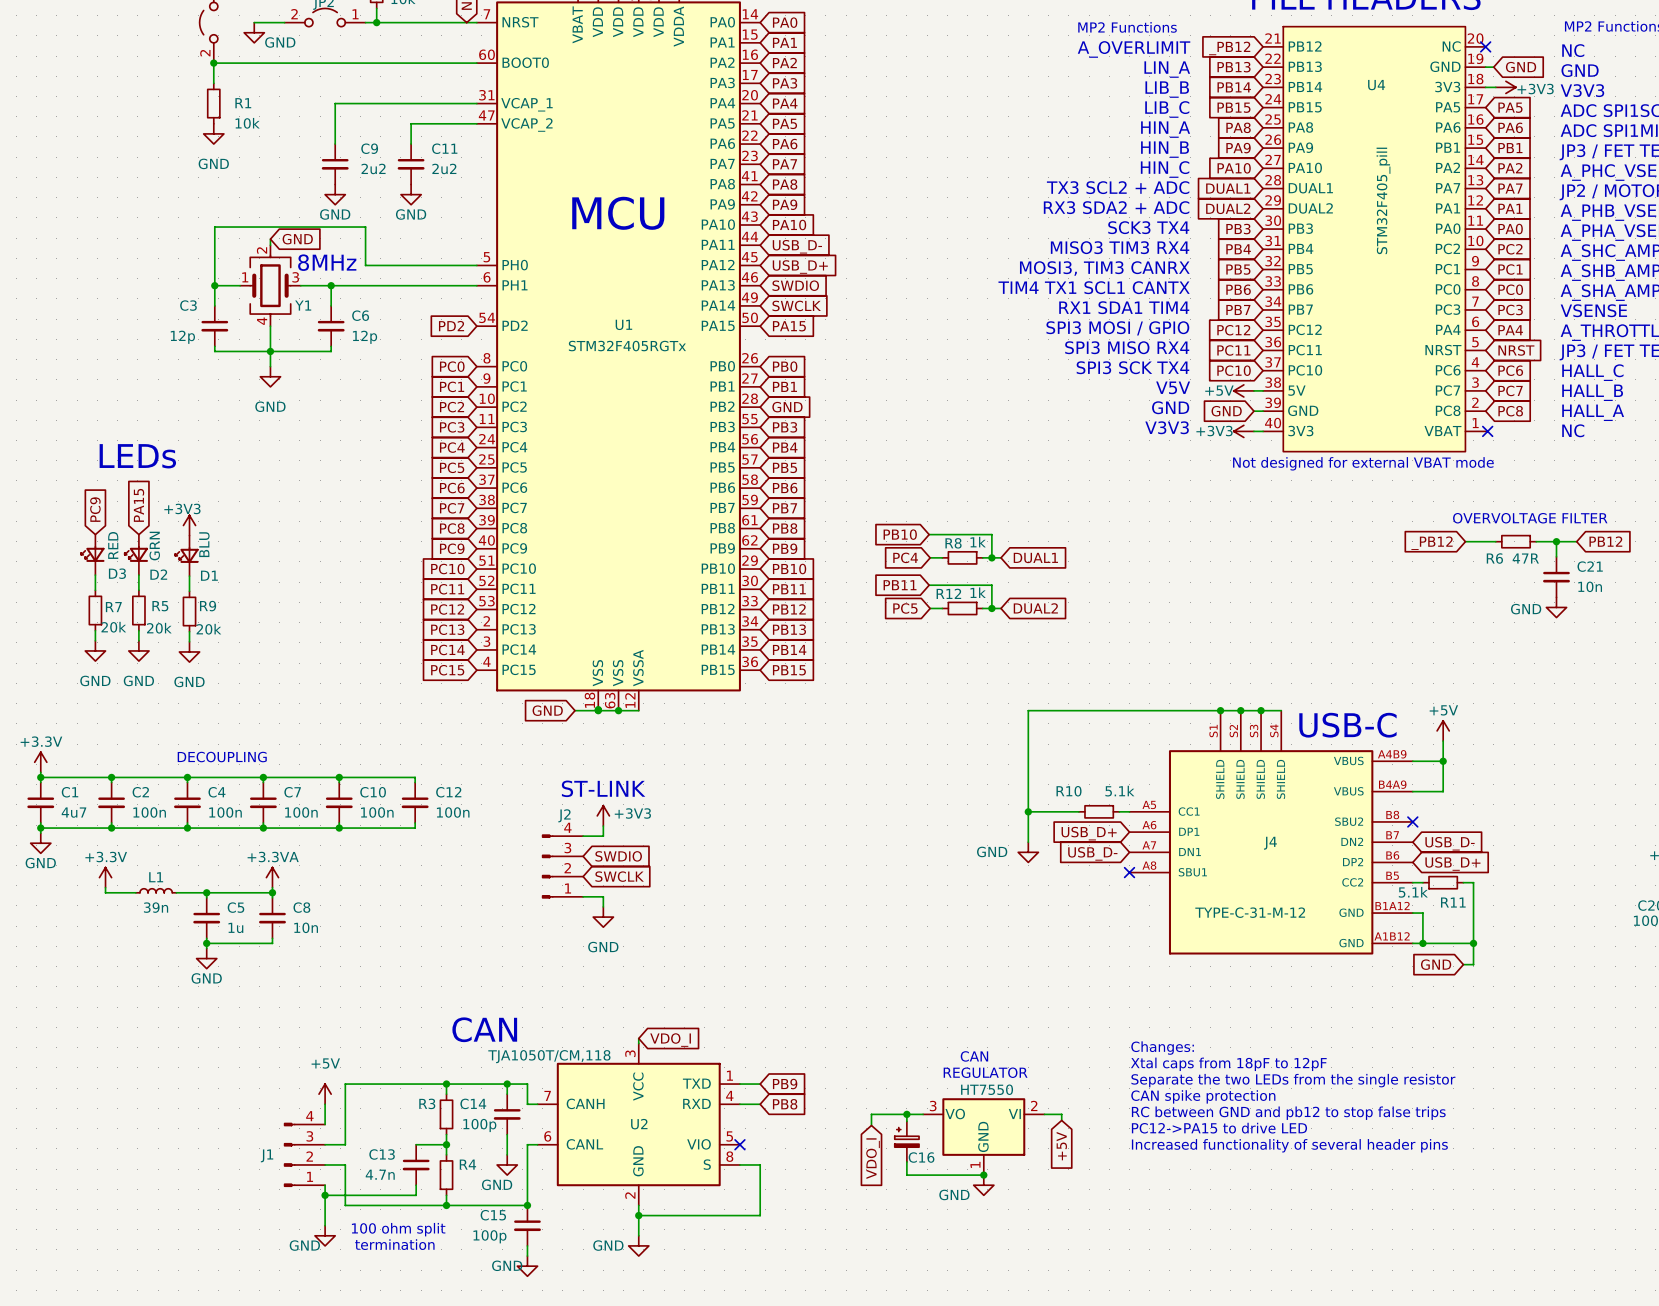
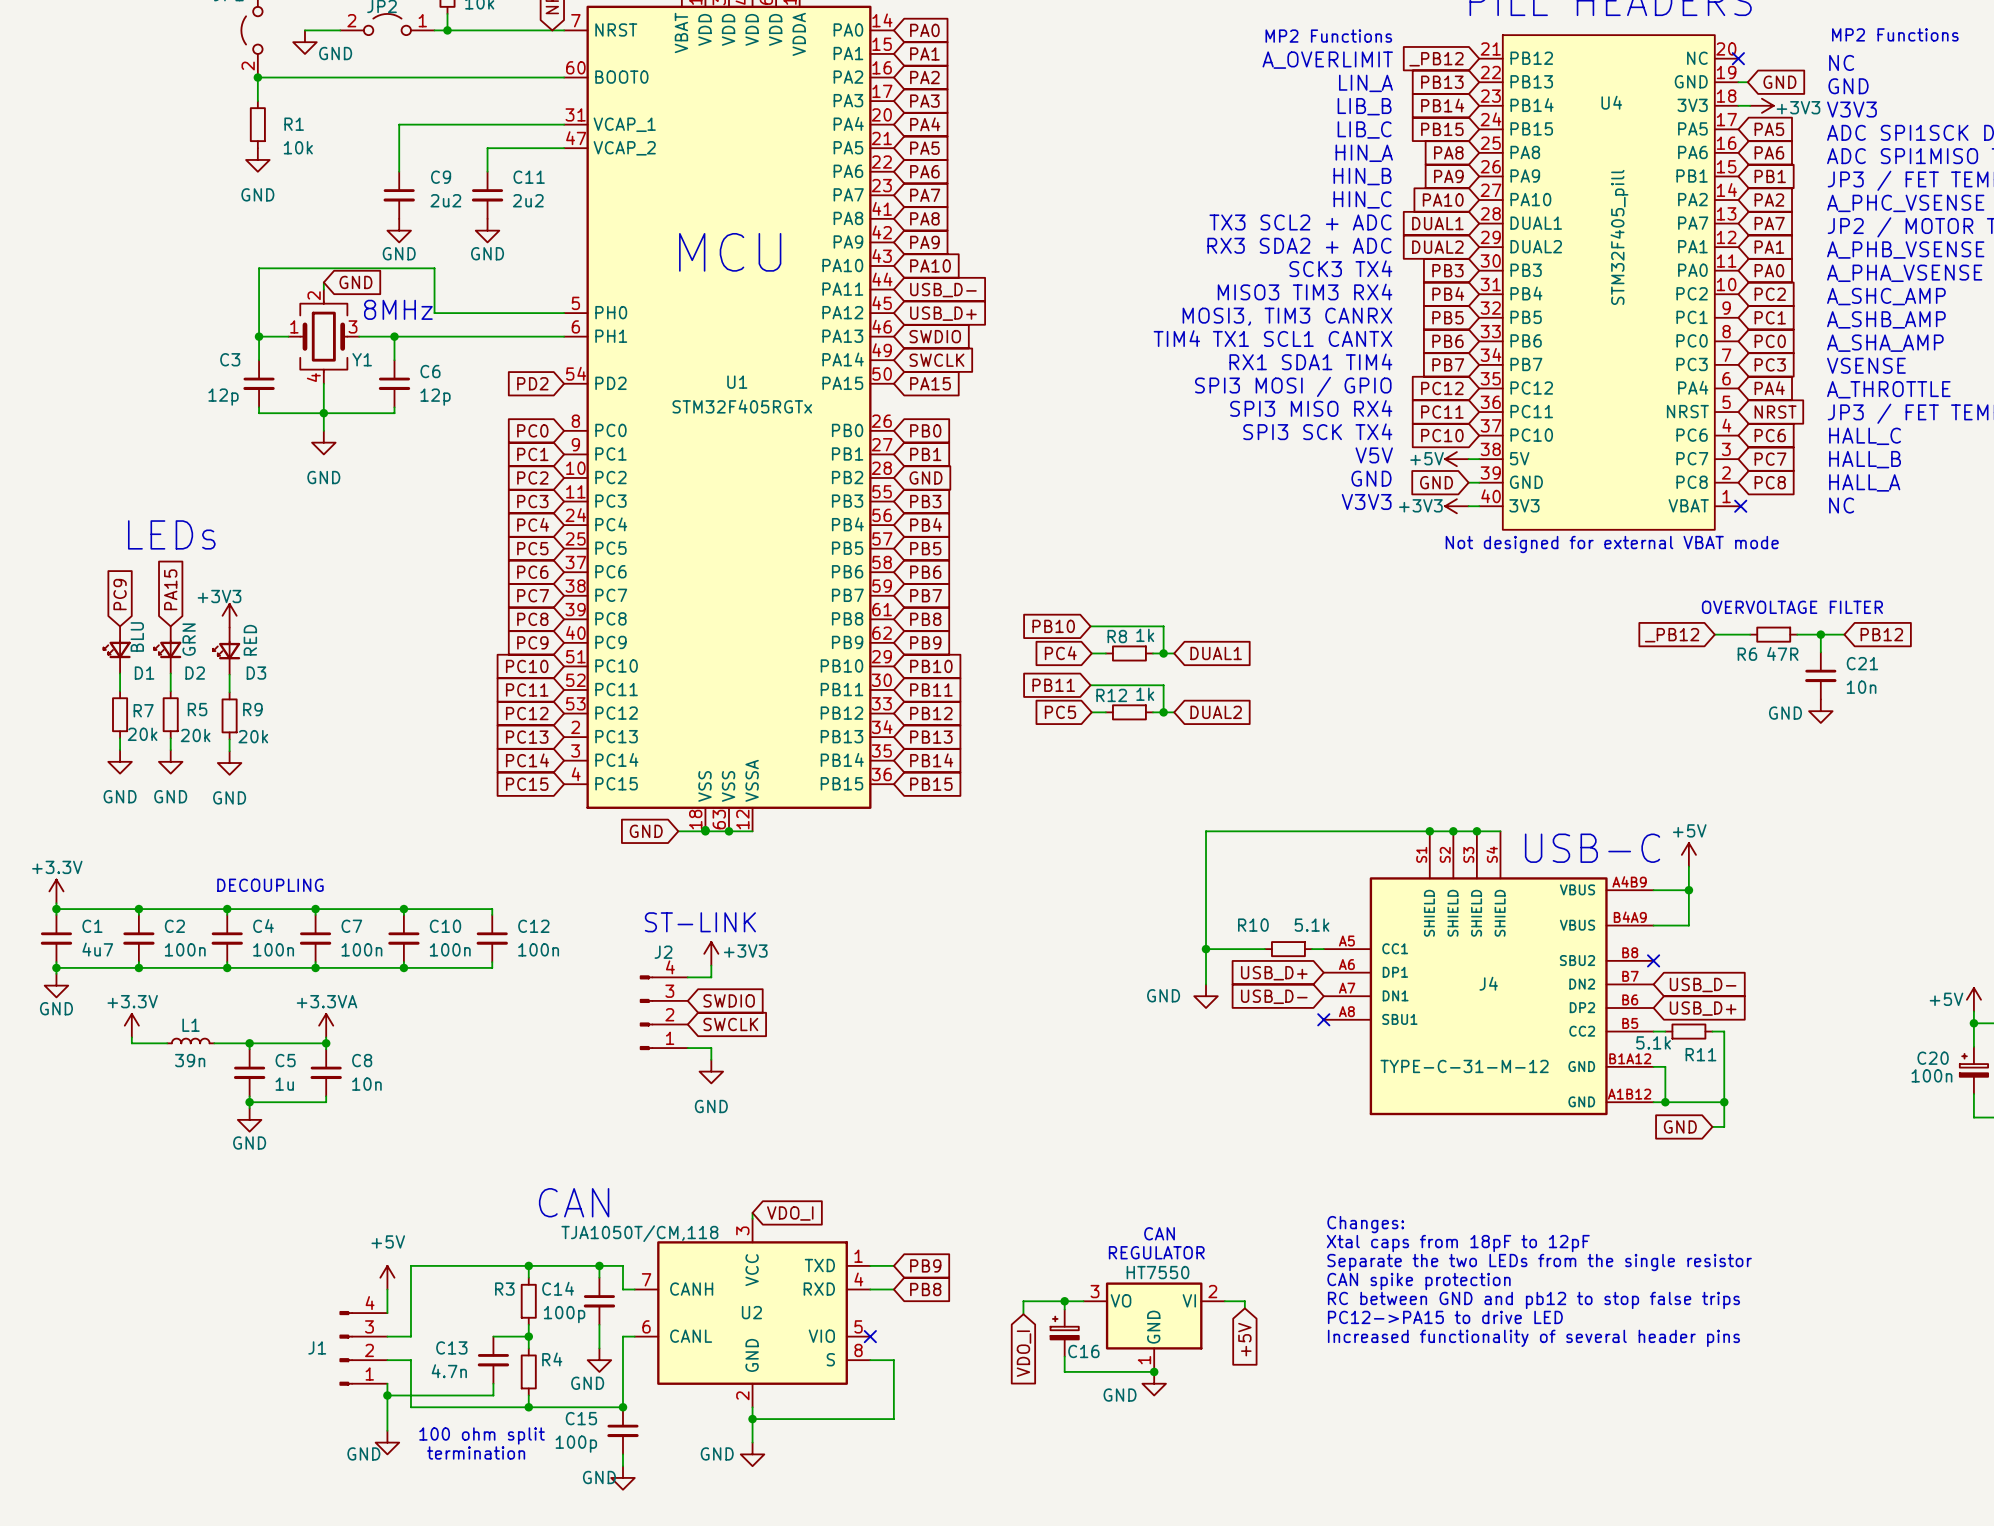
D1 value: BLU (204, 544) -> RED (250, 640)
D3 value: RED (113, 545) -> BLU (137, 636)
D3 name: D3 (117, 573) -> D1 (144, 673)
D1 name: D1 (209, 575) -> D3 (256, 673)

